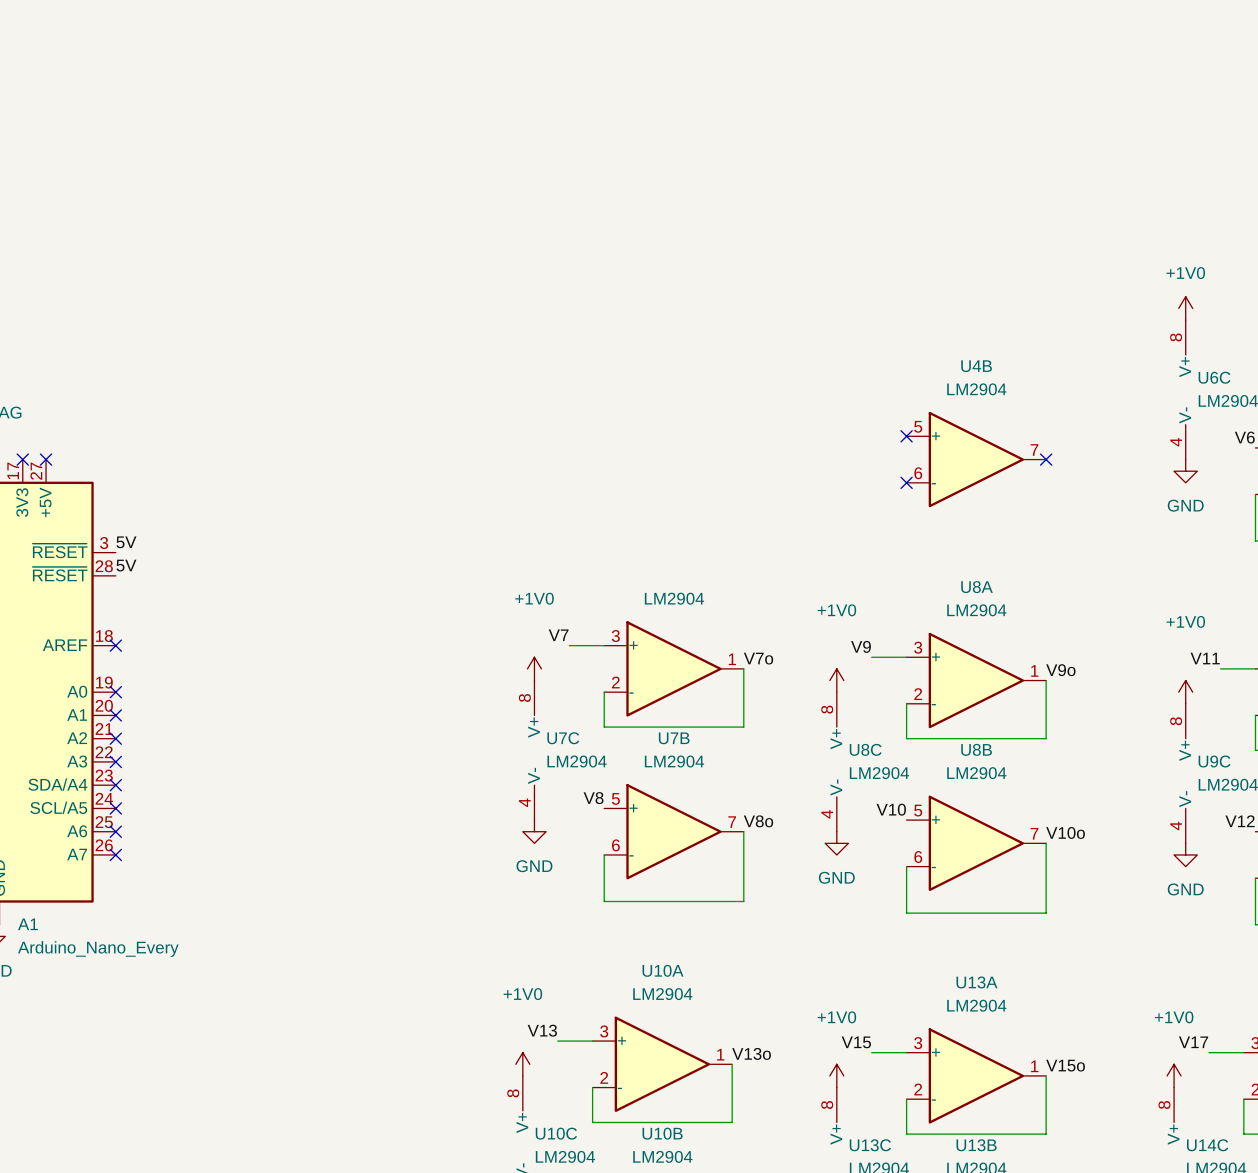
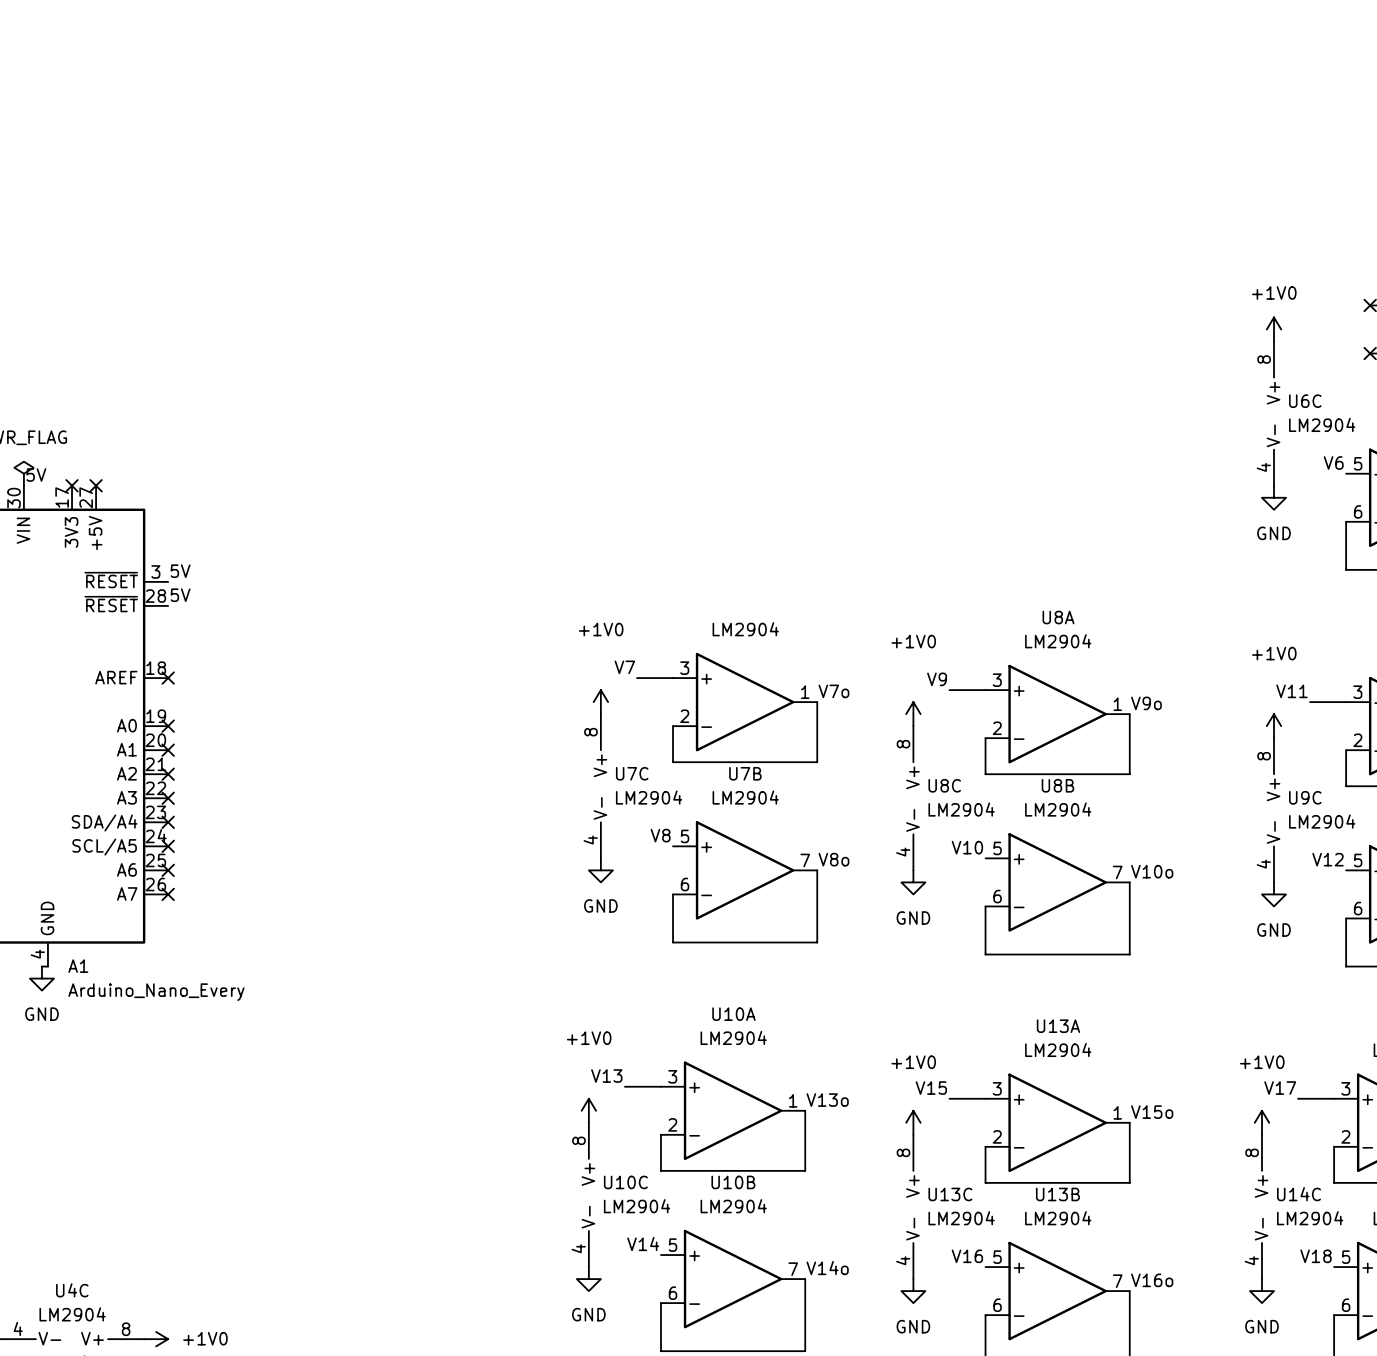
no-connect mark: (906, 436) -> none
U4B: LM2904 (976, 459) -> none
no-connect mark: (1046, 459) -> none
no-connect mark: (906, 482) -> none

